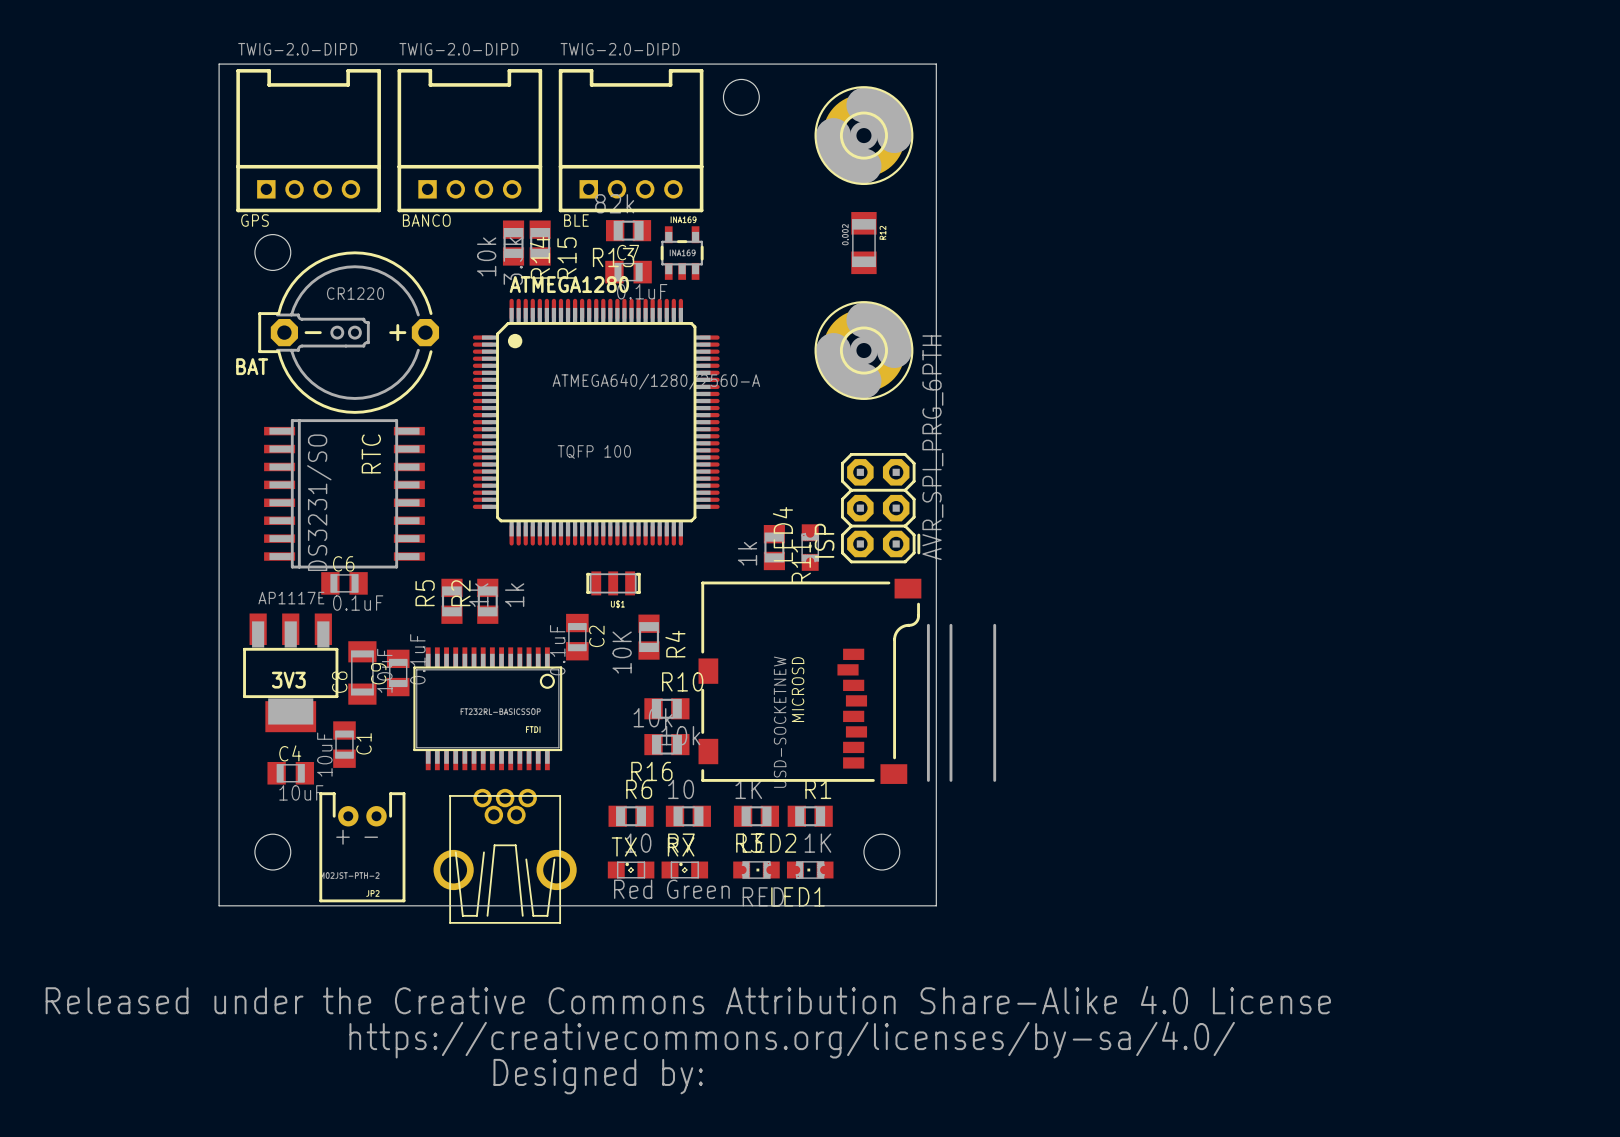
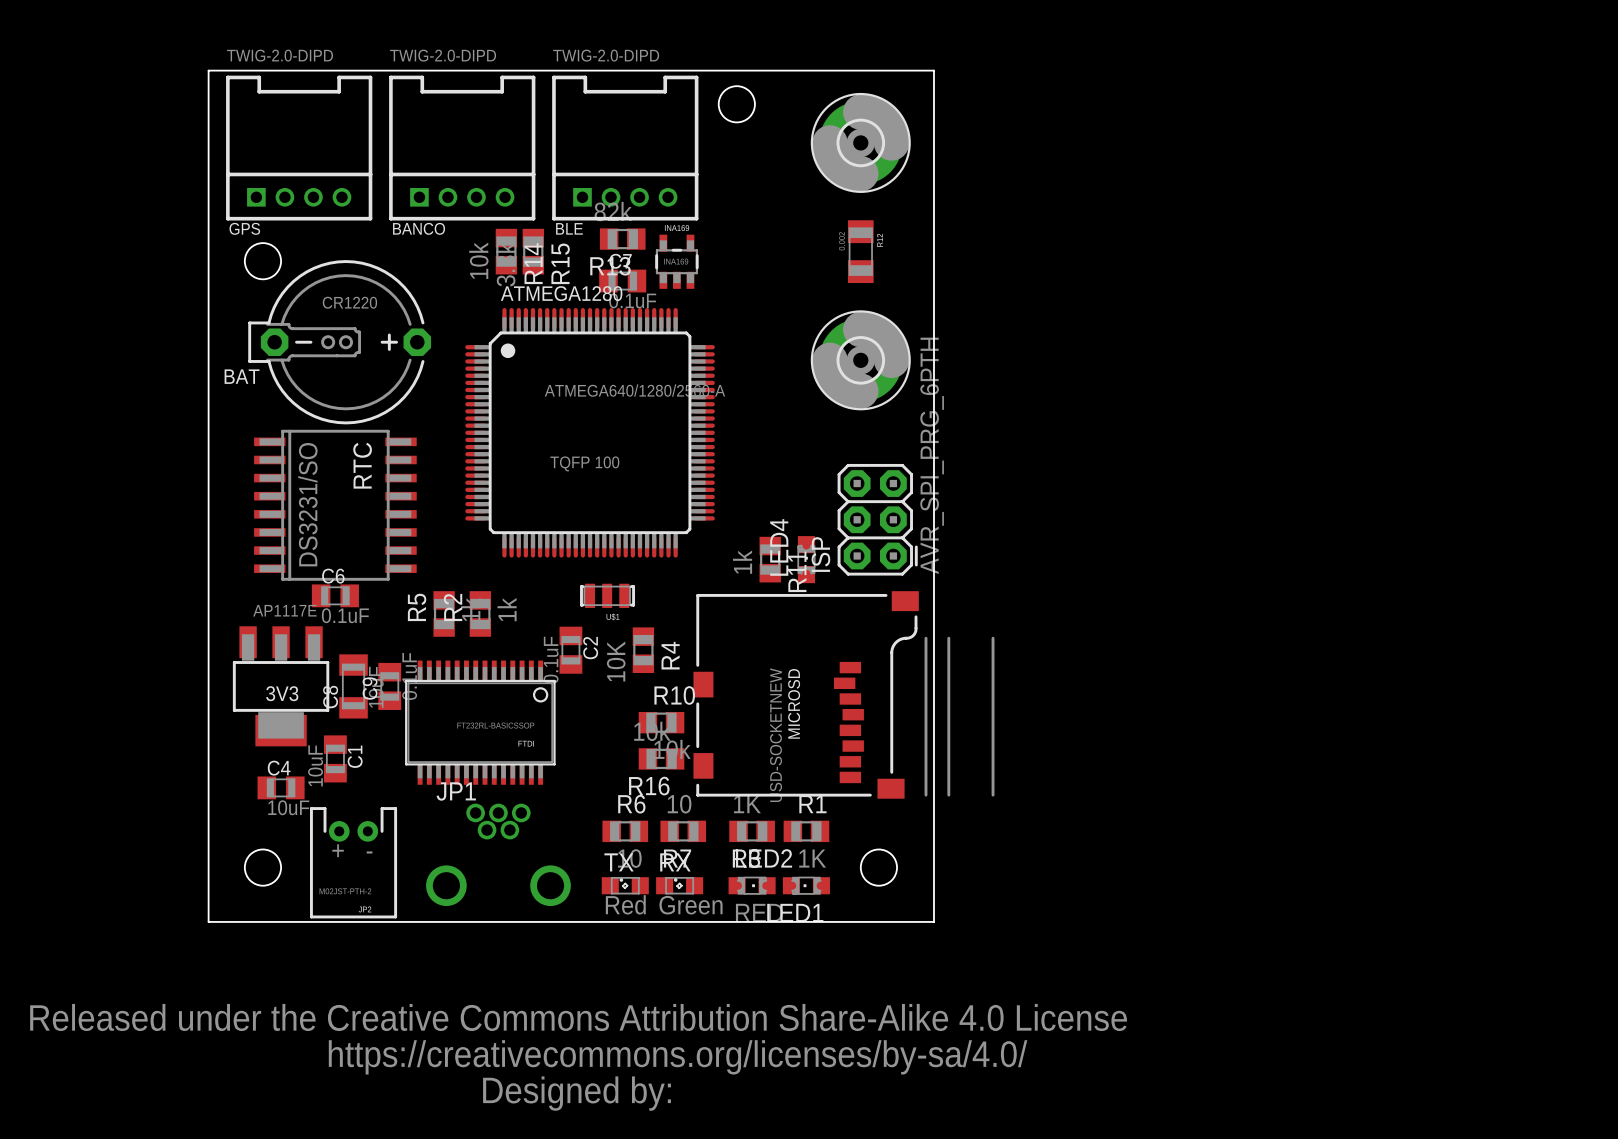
JP1 side: bottom (505, 856) -> top (498, 854)

